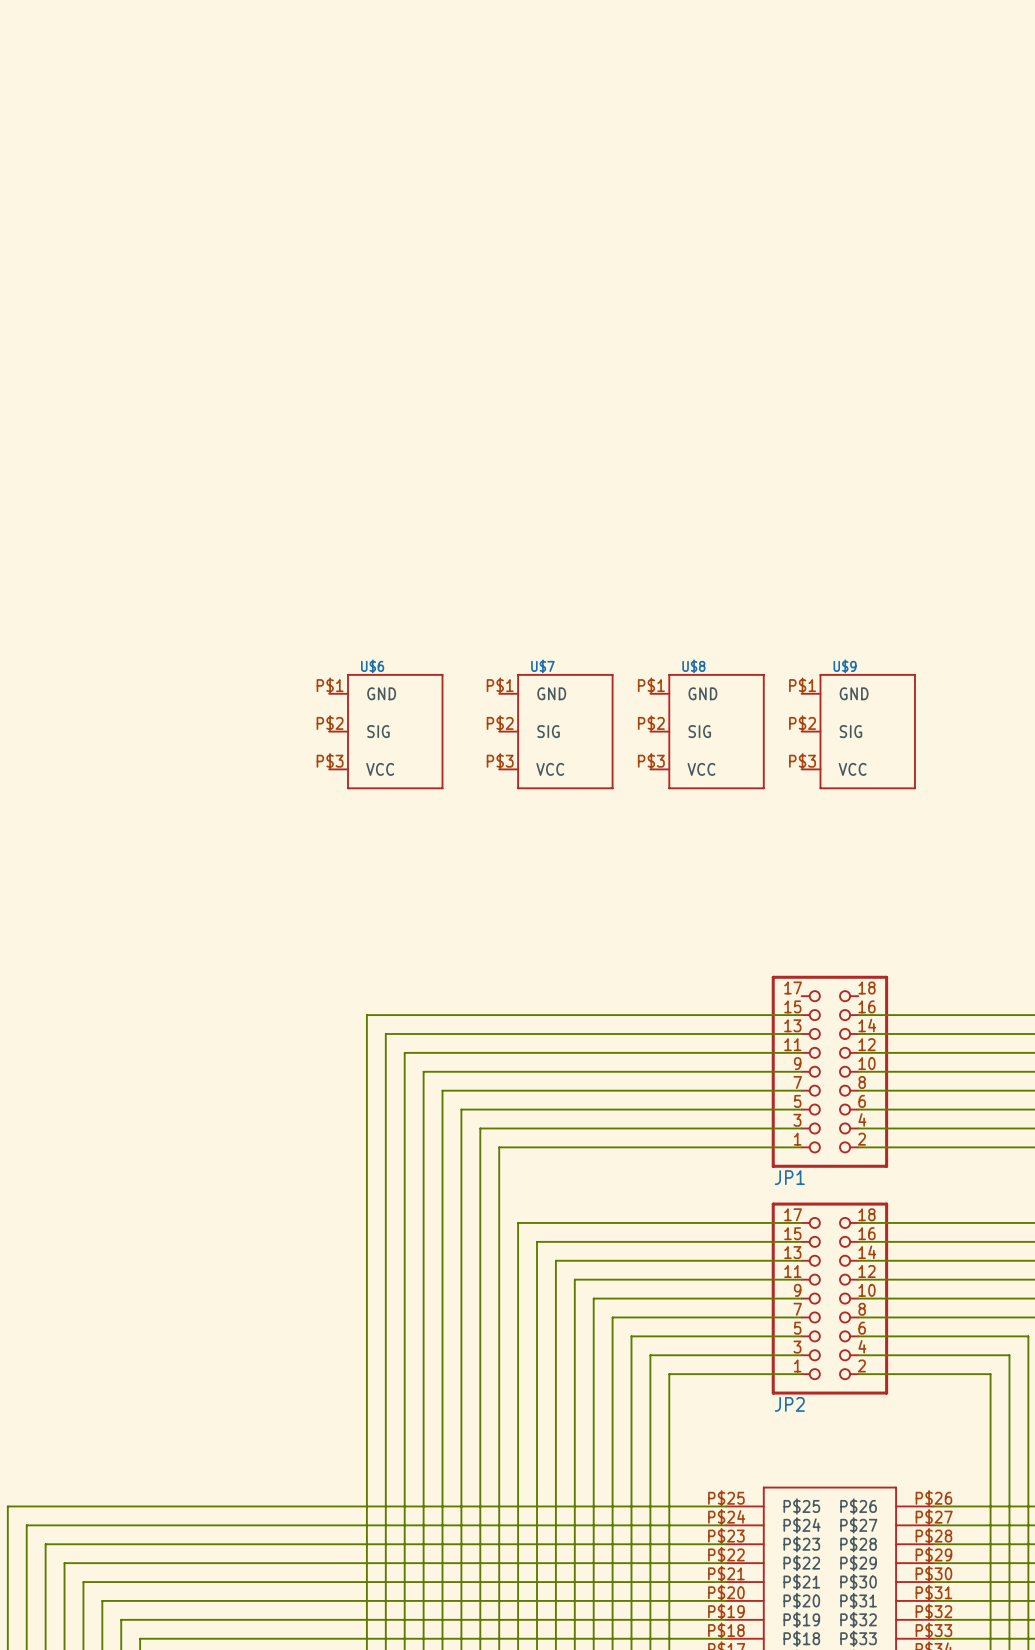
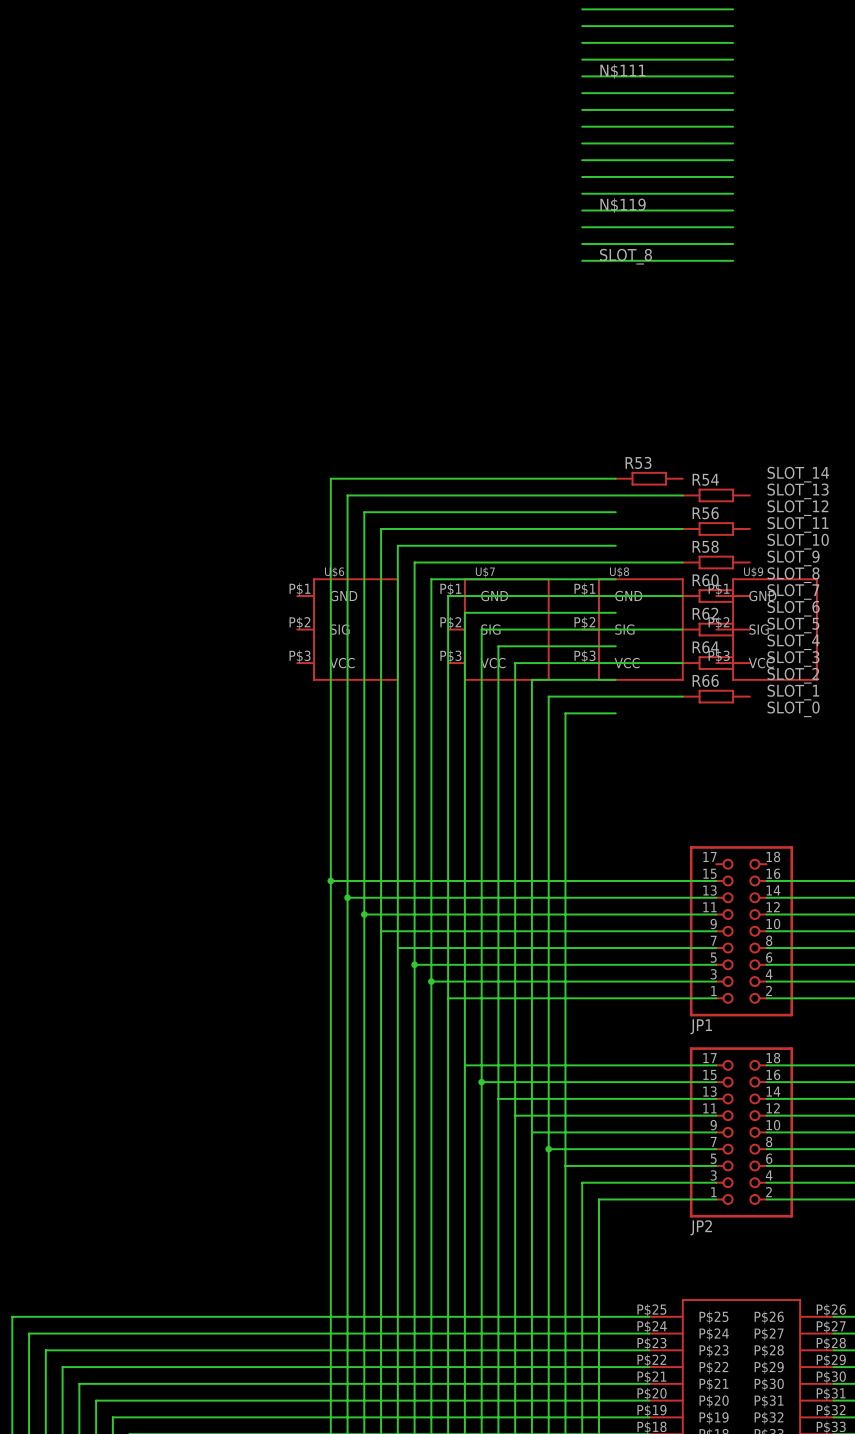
wire: none -> (582, 9) (733, 9)
wire: none -> (582, 26) (733, 26)
wire: none -> (582, 42) (733, 42)
wire: none -> (582, 59) (733, 59)
label: none -> N$111 (622, 71)
wire: none -> (582, 76) (733, 76)
wire: none -> (582, 93) (733, 93)
wire: none -> (582, 109) (733, 109)
wire: none -> (582, 126) (733, 126)
wire: none -> (582, 143) (733, 143)
wire: none -> (582, 160) (733, 160)
wire: none -> (582, 176) (733, 176)
wire: none -> (582, 193) (733, 193)
label: none -> N$119 (623, 205)
wire: none -> (582, 210) (733, 210)
wire: none -> (582, 227) (733, 227)
wire: none -> (582, 244) (733, 244)
label: none -> SLOT_8 (625, 256)
wire: none -> (582, 260) (733, 260)
label: none -> SLOT_14 (798, 474)
wire: none -> (615, 478) (330, 478) (330, 880)
R53: none -> (649, 478)
label: none -> SLOT_13 (798, 491)
wire: none -> (682, 495) (347, 495) (347, 897)
R54: none -> (716, 495)
label: none -> SLOT_12 (797, 508)
wire: none -> (615, 512) (364, 512) (364, 914)
label: none -> SLOT_11 (798, 524)
wire: none -> (682, 528) (381, 528) (381, 931)
R56: none -> (716, 528)
label: none -> SLOT_10 (798, 541)
wire: none -> (615, 545) (397, 545) (397, 948)
label: none -> SLOT_9 (793, 558)
wire: none -> (682, 562) (414, 562) (414, 964)
R58: none -> (716, 562)
label: none -> SLOT_8 (793, 575)
wire: none -> (615, 579) (431, 579) (431, 981)
label: none -> SLOT_7 (793, 591)
wire: none -> (682, 596) (448, 596) (448, 998)
R60: none -> (716, 596)
label: none -> SLOT_6 (793, 608)
wire: none -> (615, 612) (464, 612) (464, 1065)
label: none -> SLOT_5 (793, 625)
wire: none -> (682, 629) (481, 629) (481, 1082)
R62: none -> (716, 629)
label: none -> SLOT_4 (793, 642)
wire: none -> (615, 646) (498, 646) (498, 1098)
label: none -> SLOT_3 (793, 659)
wire: none -> (682, 663) (515, 663) (515, 1115)
R64: none -> (716, 663)
label: none -> SLOT_2 (793, 675)
wire: none -> (615, 679) (531, 679) (531, 1132)
label: none -> SLOT_1 (793, 692)
wire: none -> (682, 696) (548, 696) (548, 1149)
R66: none -> (716, 696)
label: none -> SLOT_0 (793, 709)
wire: none -> (615, 713) (565, 713) (565, 1165)
junction: none -> (330, 880)
junction: none -> (347, 897)
junction: none -> (364, 914)
junction: none -> (414, 964)
junction: none -> (431, 981)
junction: none -> (481, 1082)
junction: none -> (548, 1149)

